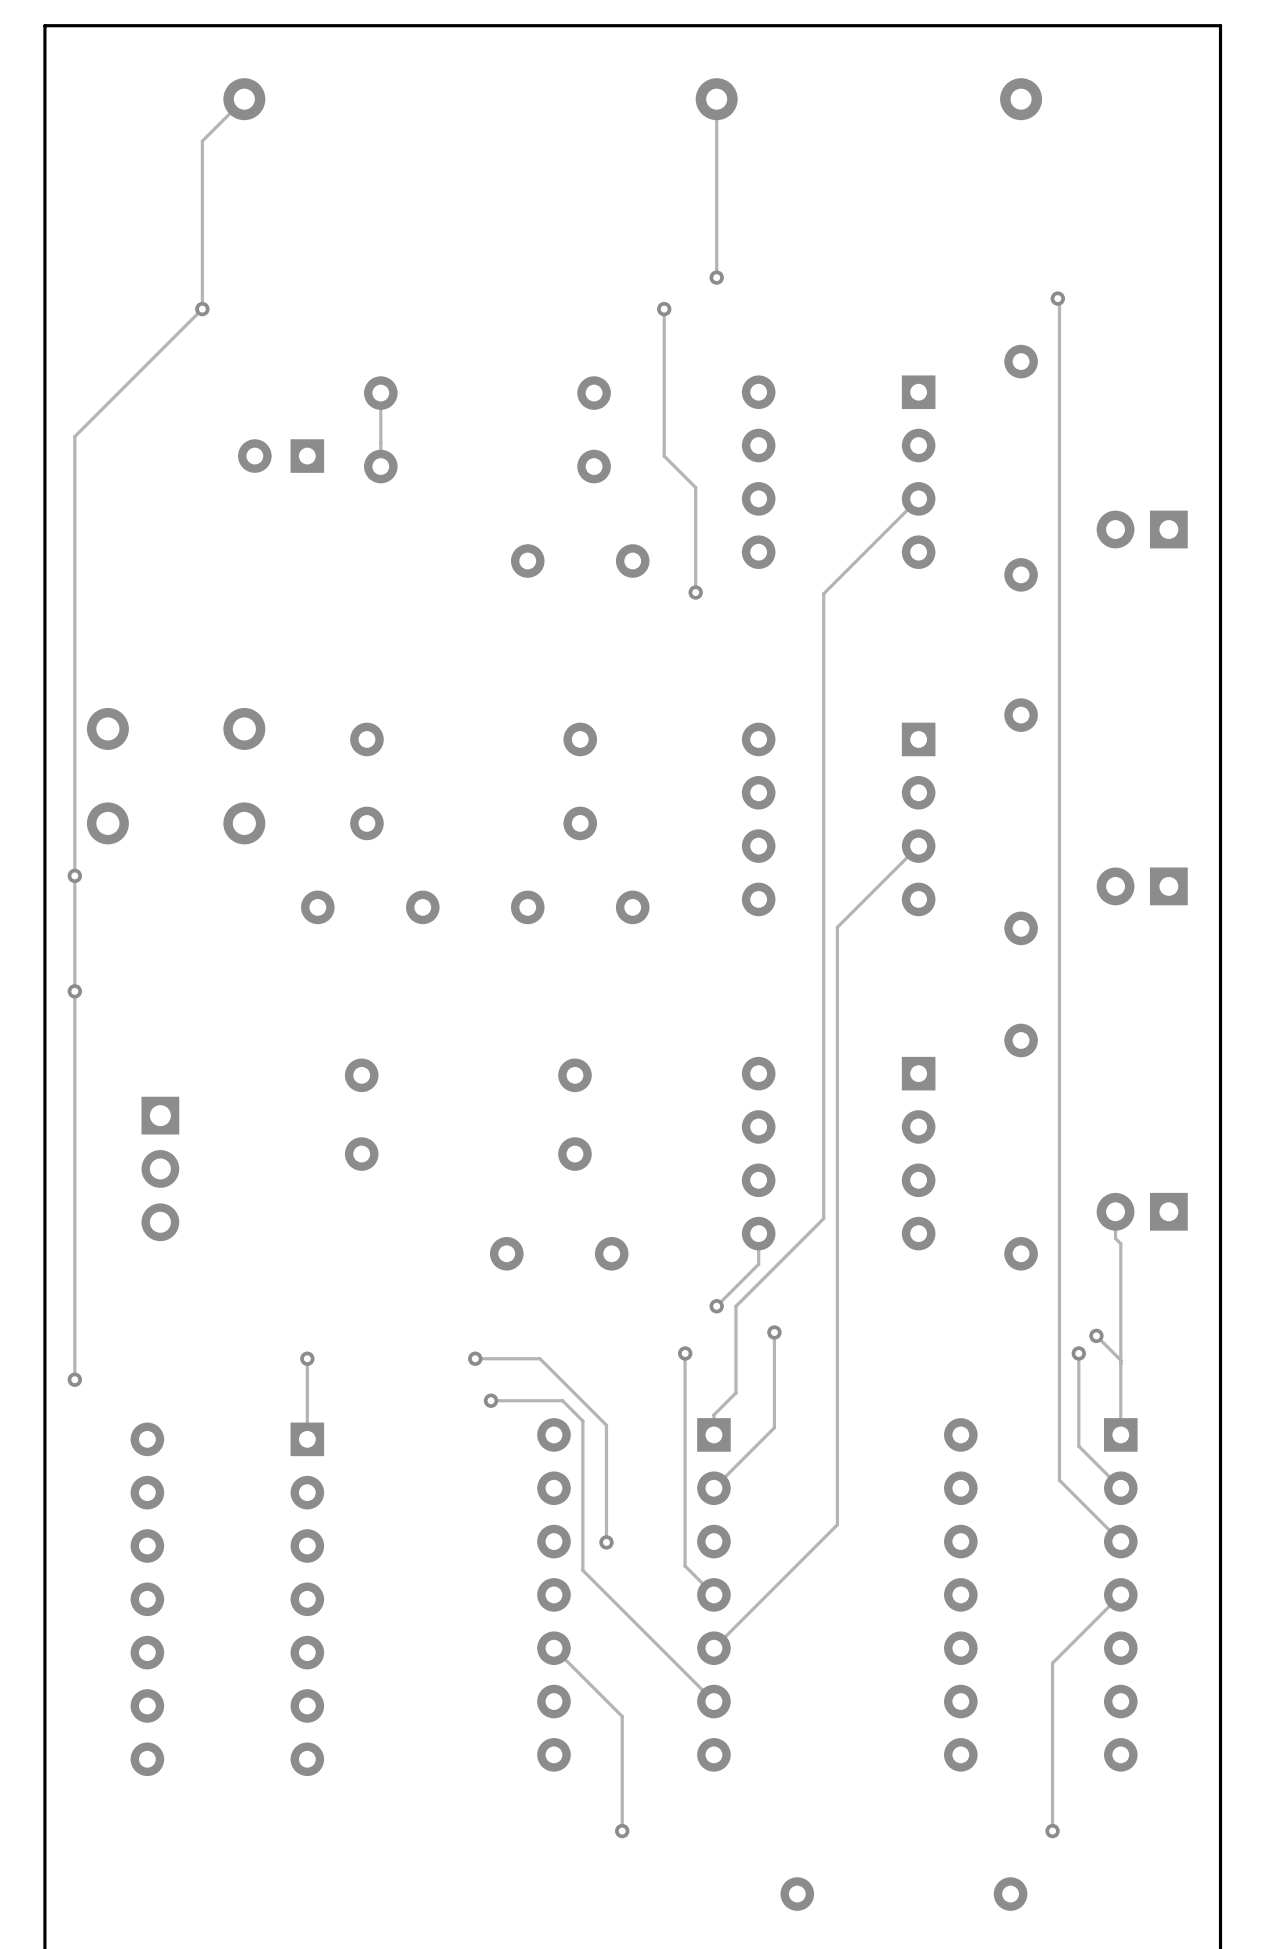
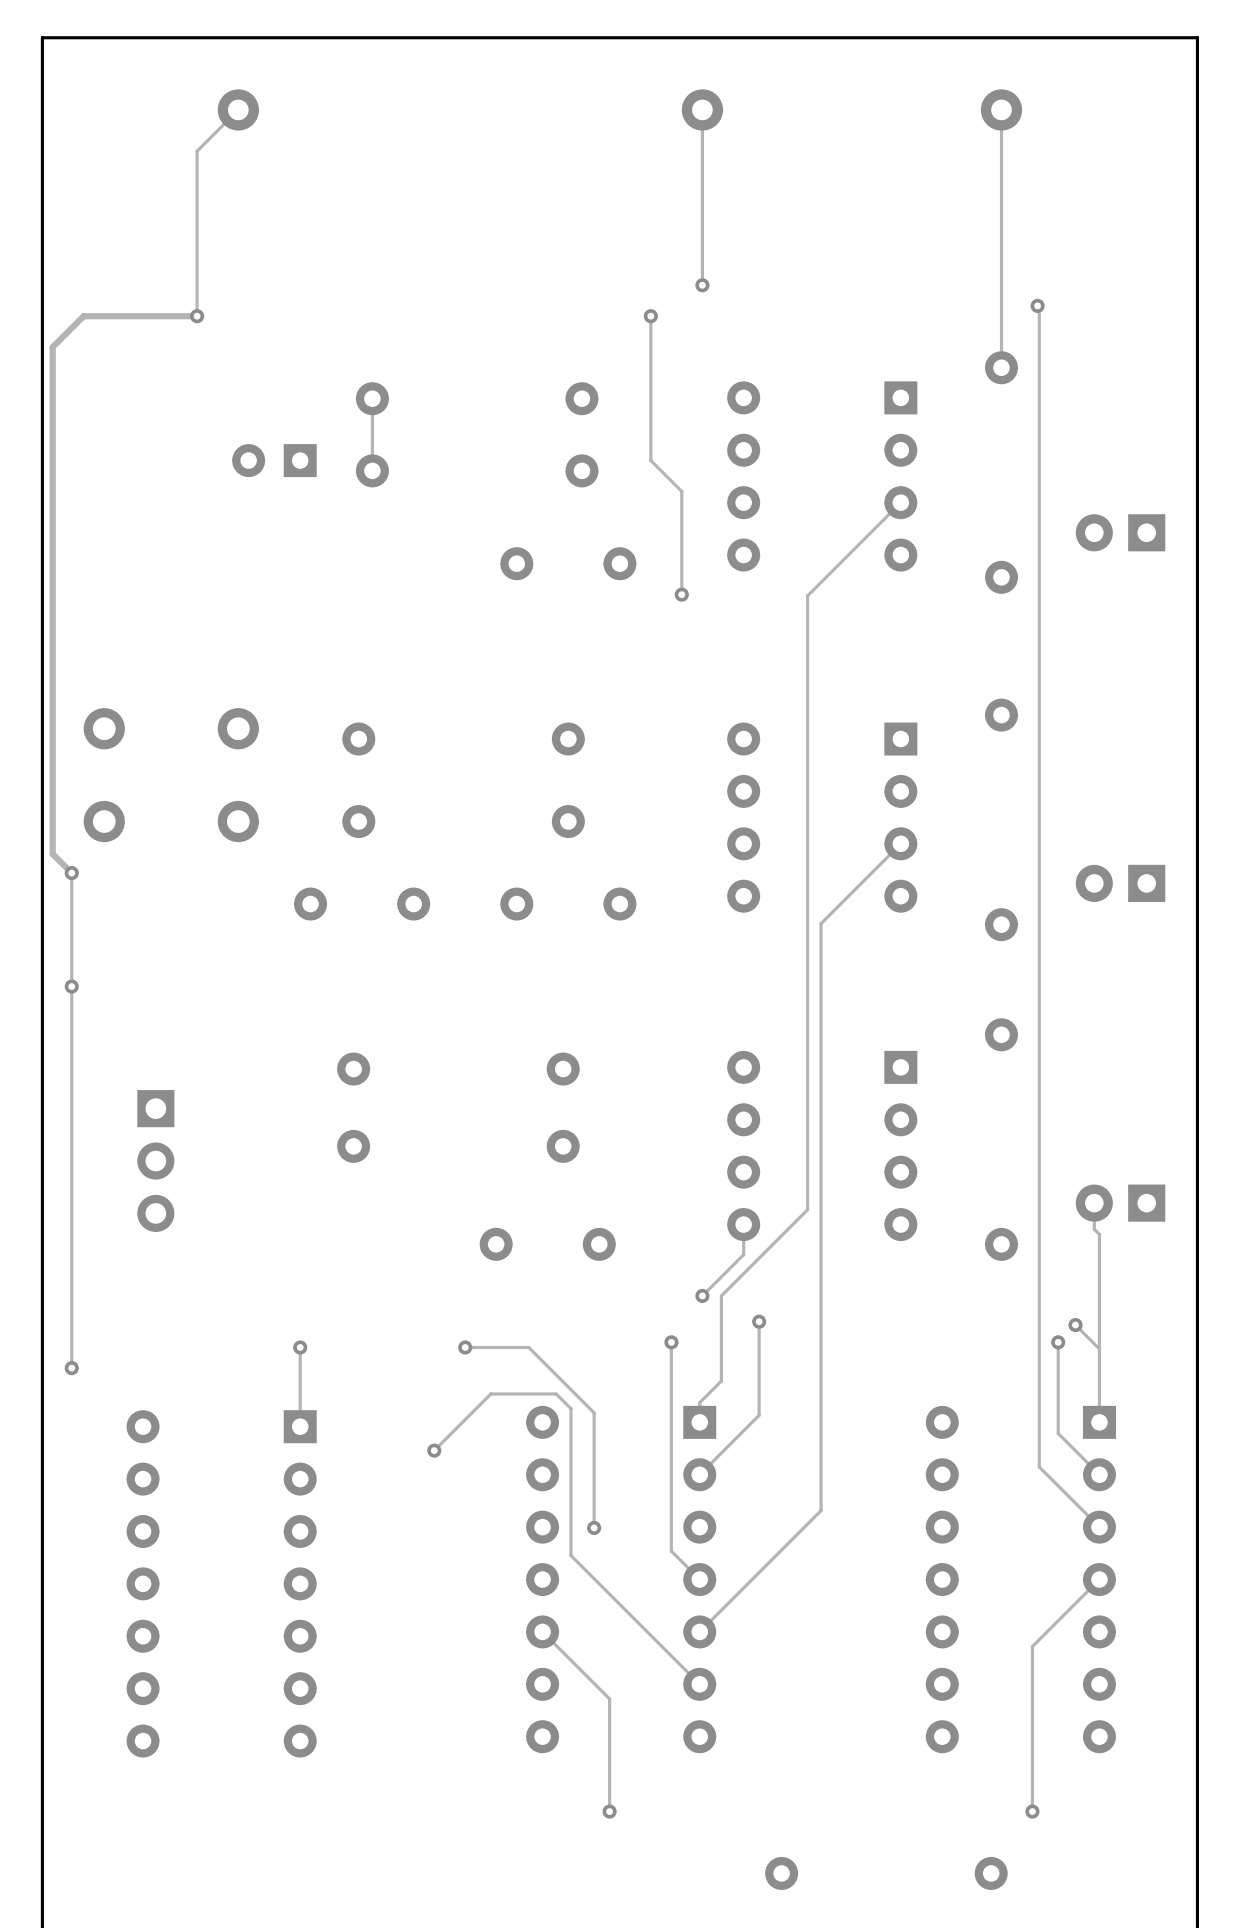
track: none -> (1001, 109) (1001, 367)
track: (202, 309) (74, 436) (74, 875) -> (197, 316) (83, 316) (52, 347) (52, 854) (71, 873)
track: (491, 1400) (562, 1400) (567, 1406) -> (434, 1450) (490, 1393) (556, 1393)
via position: (491, 1400) -> (434, 1450)

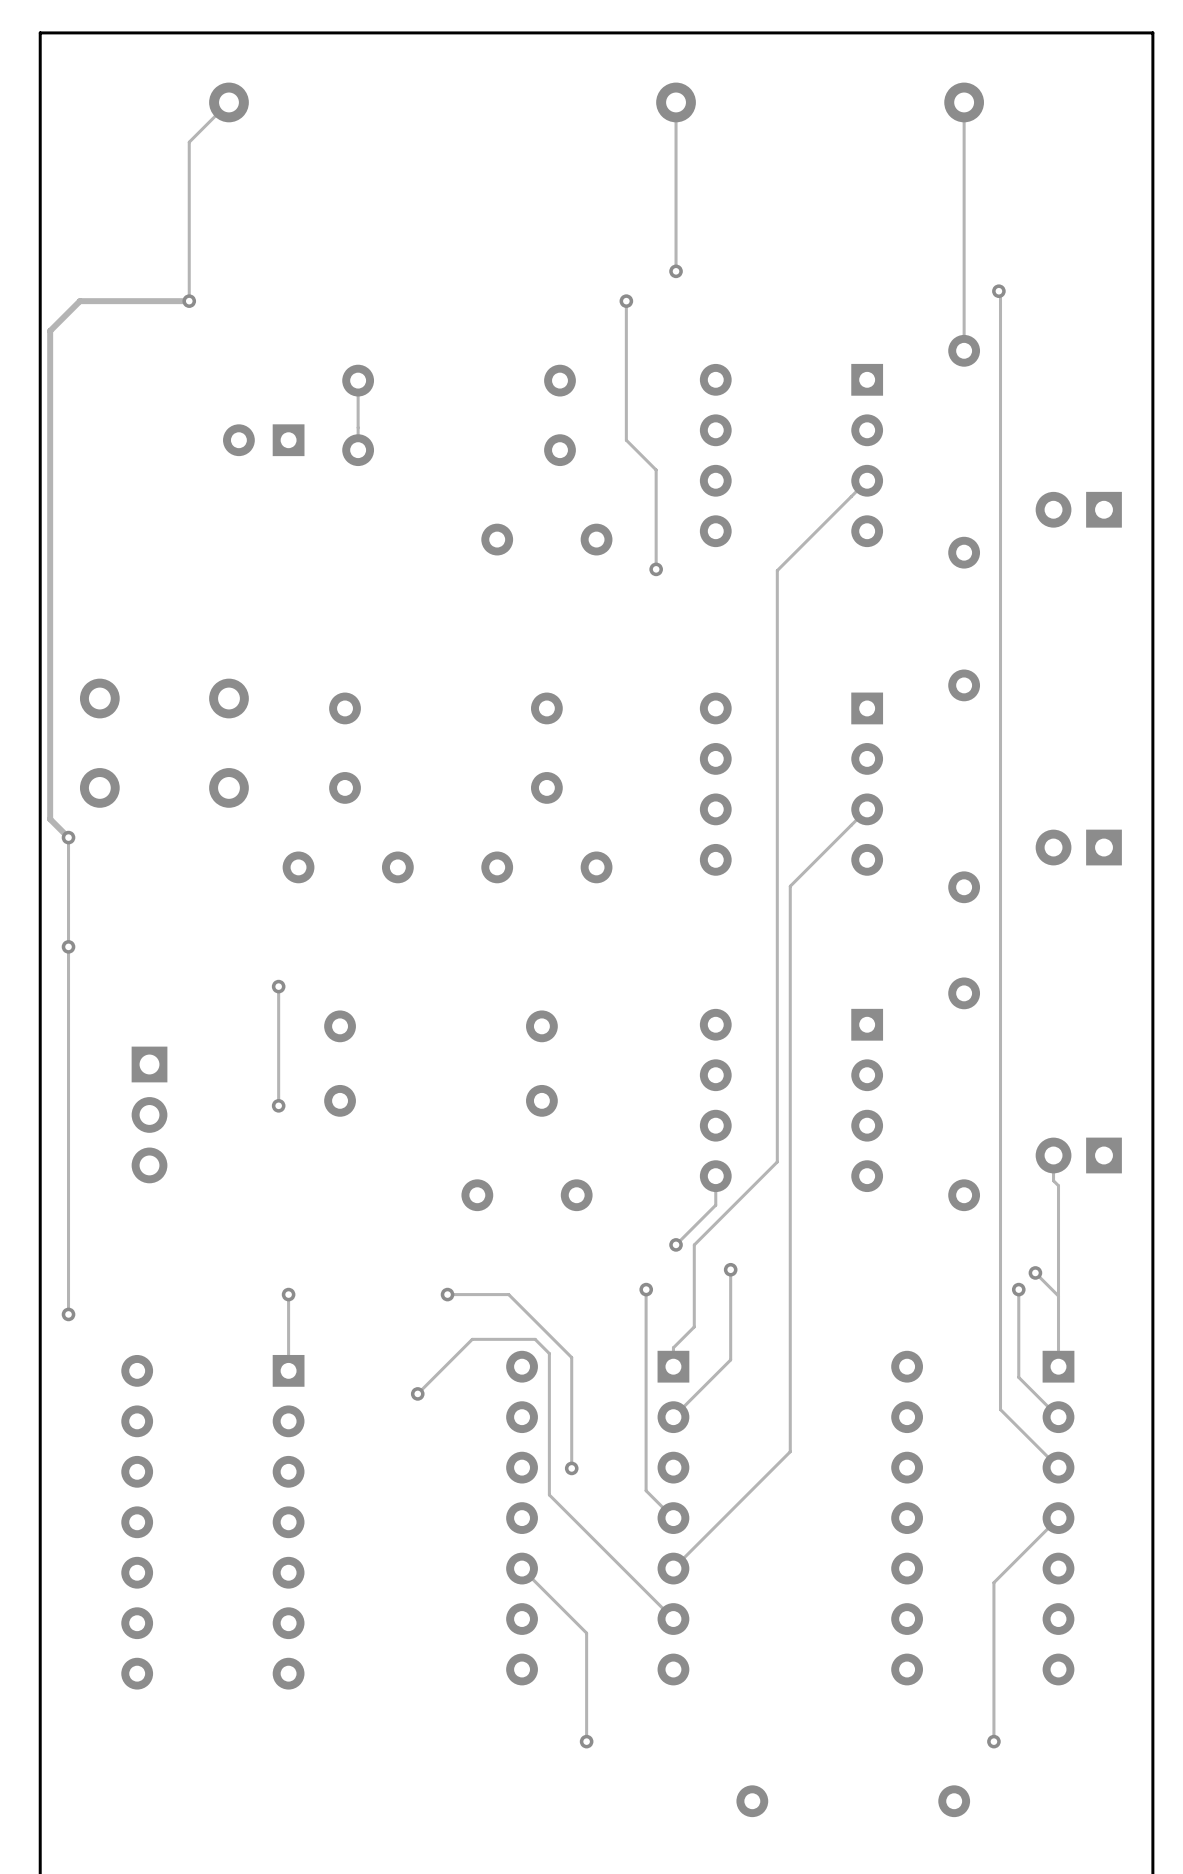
track: none -> (278, 986) (278, 1105)
via: none -> (278, 986)
via: none -> (278, 1105)

